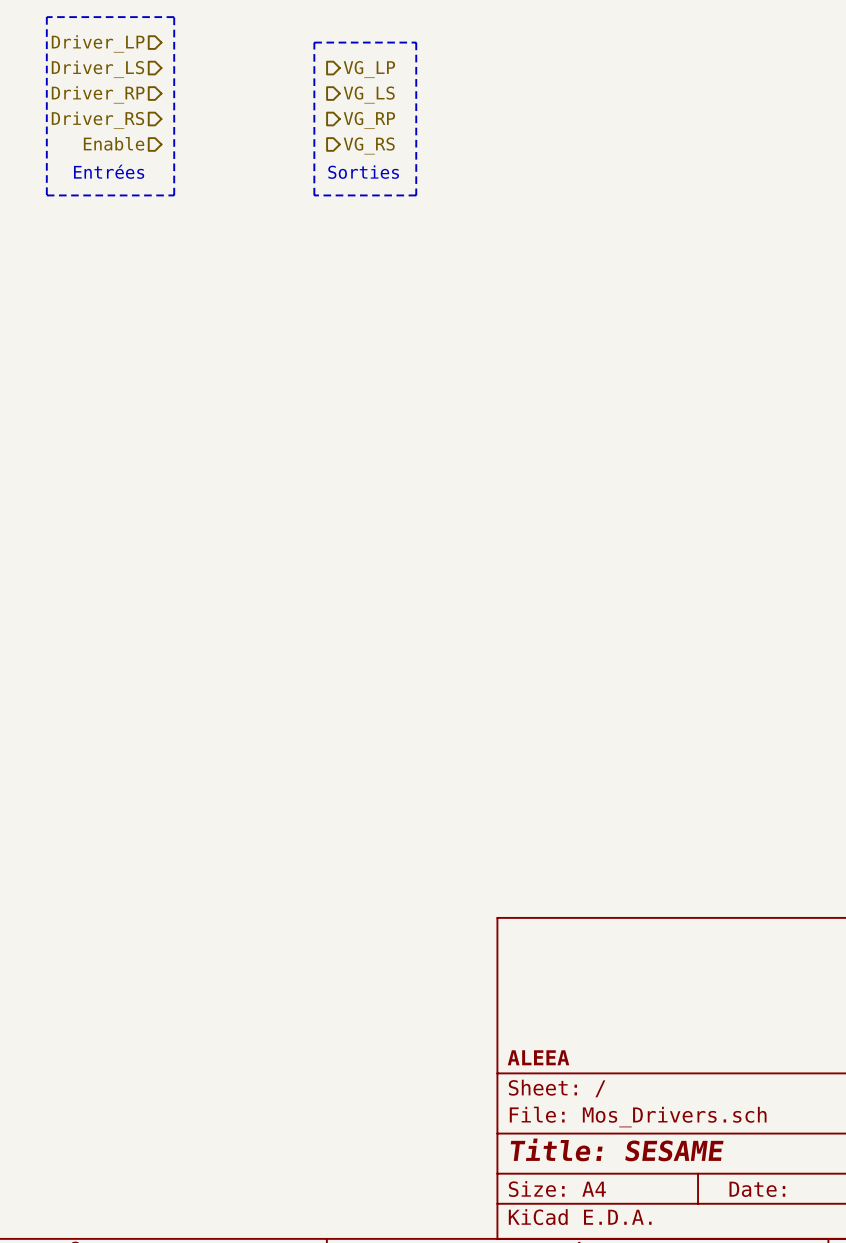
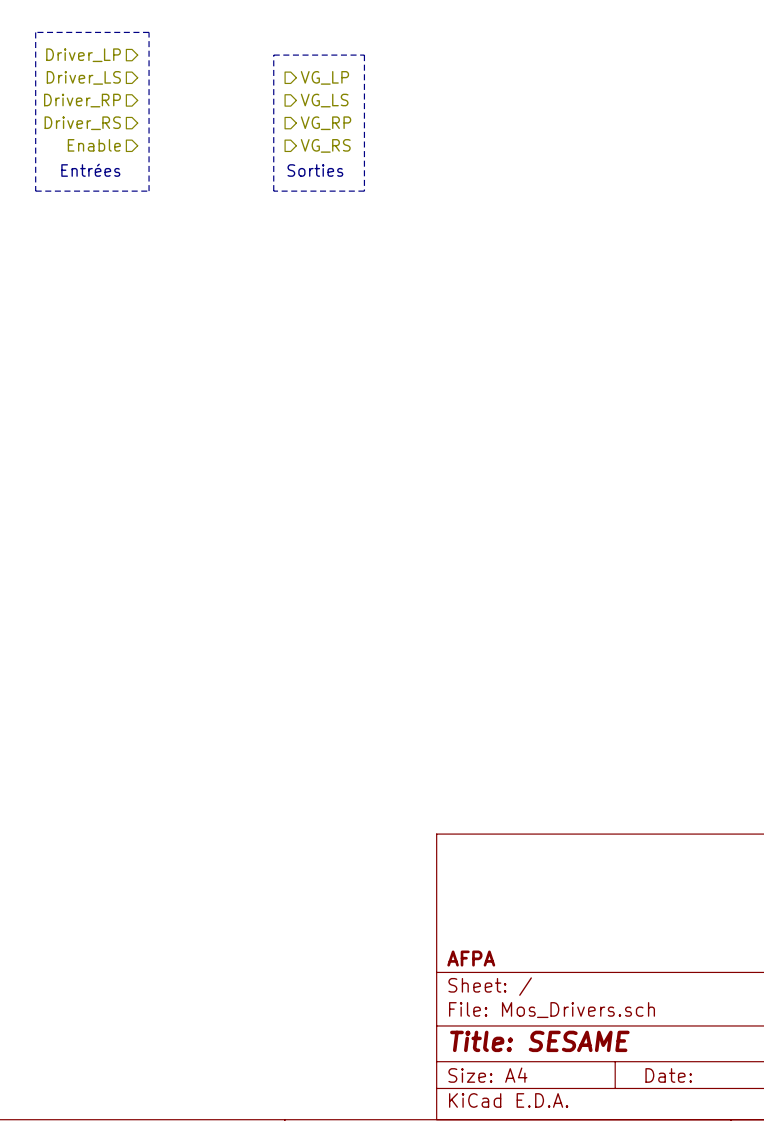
title block: ALEEA (538, 1057) -> AFPA (471, 958)

